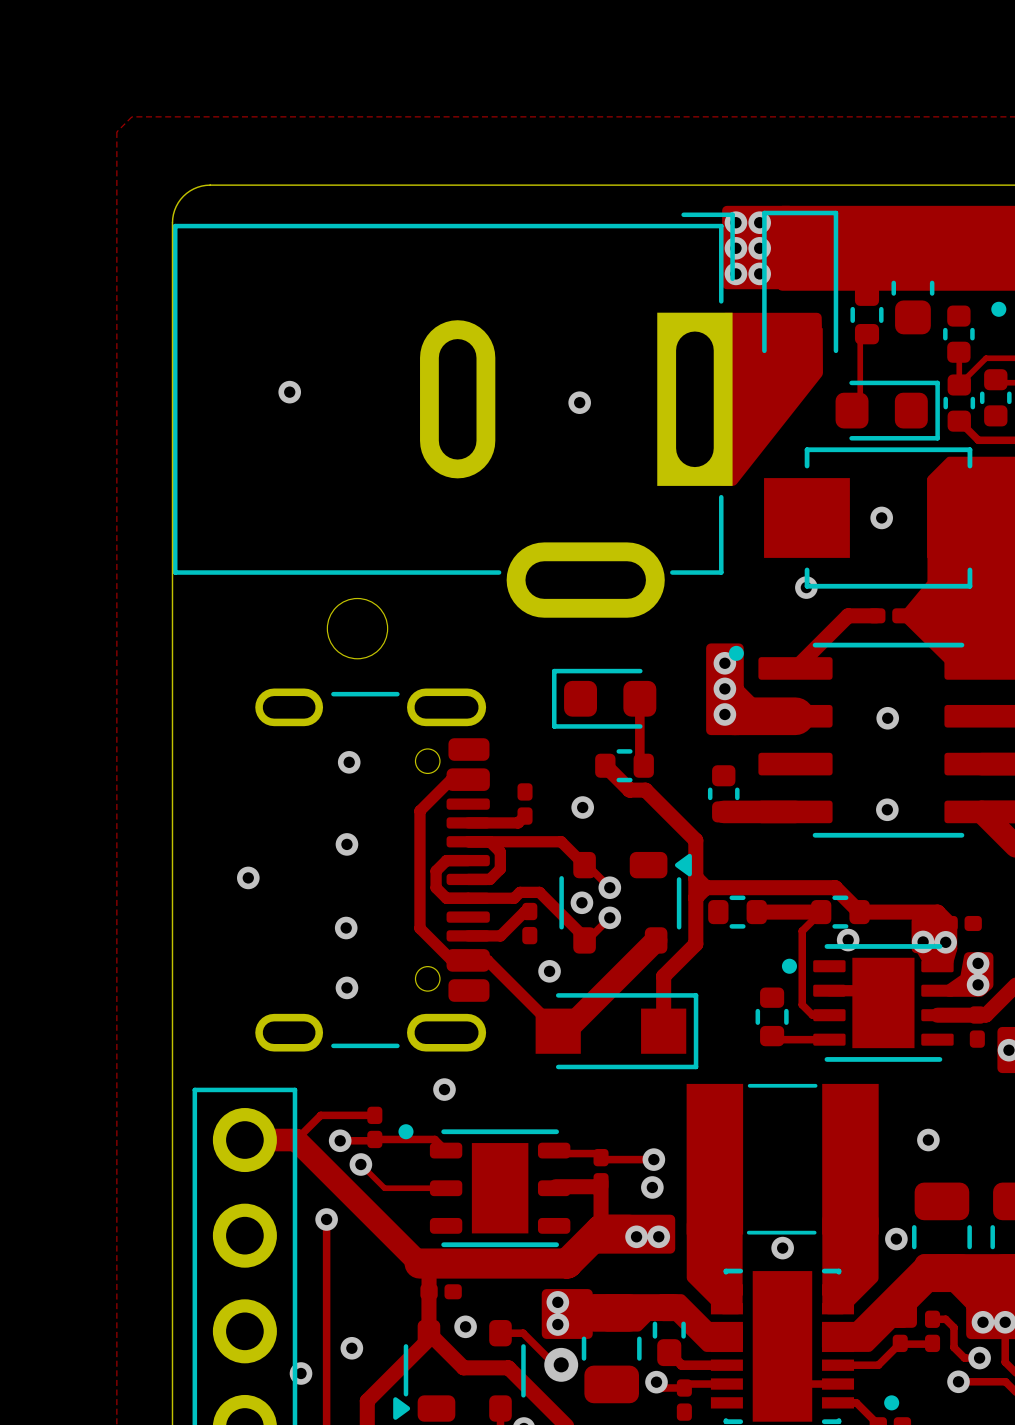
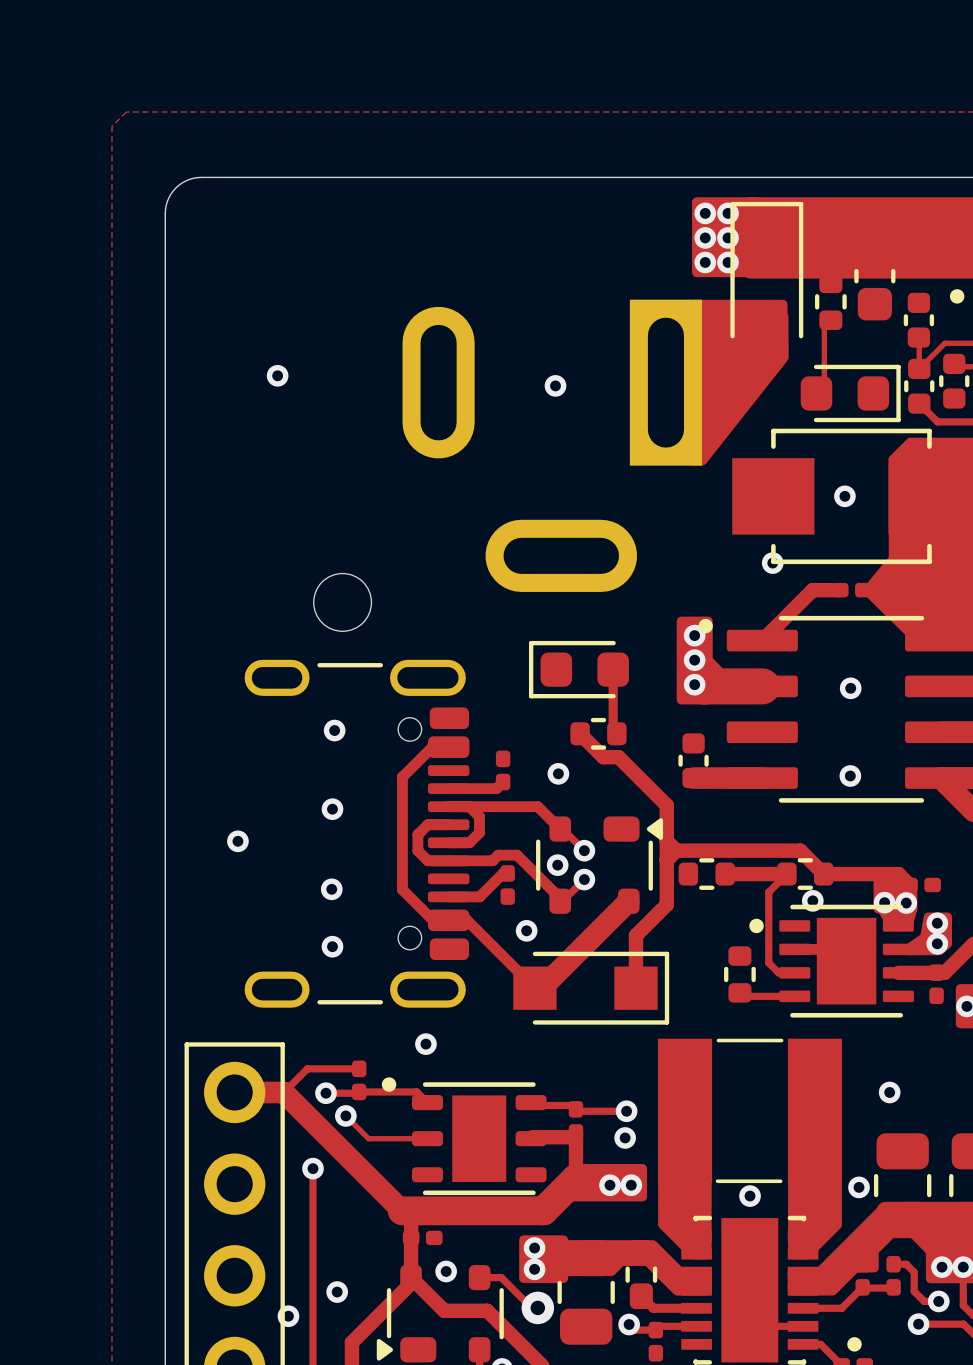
part: (453, 415) -> none

